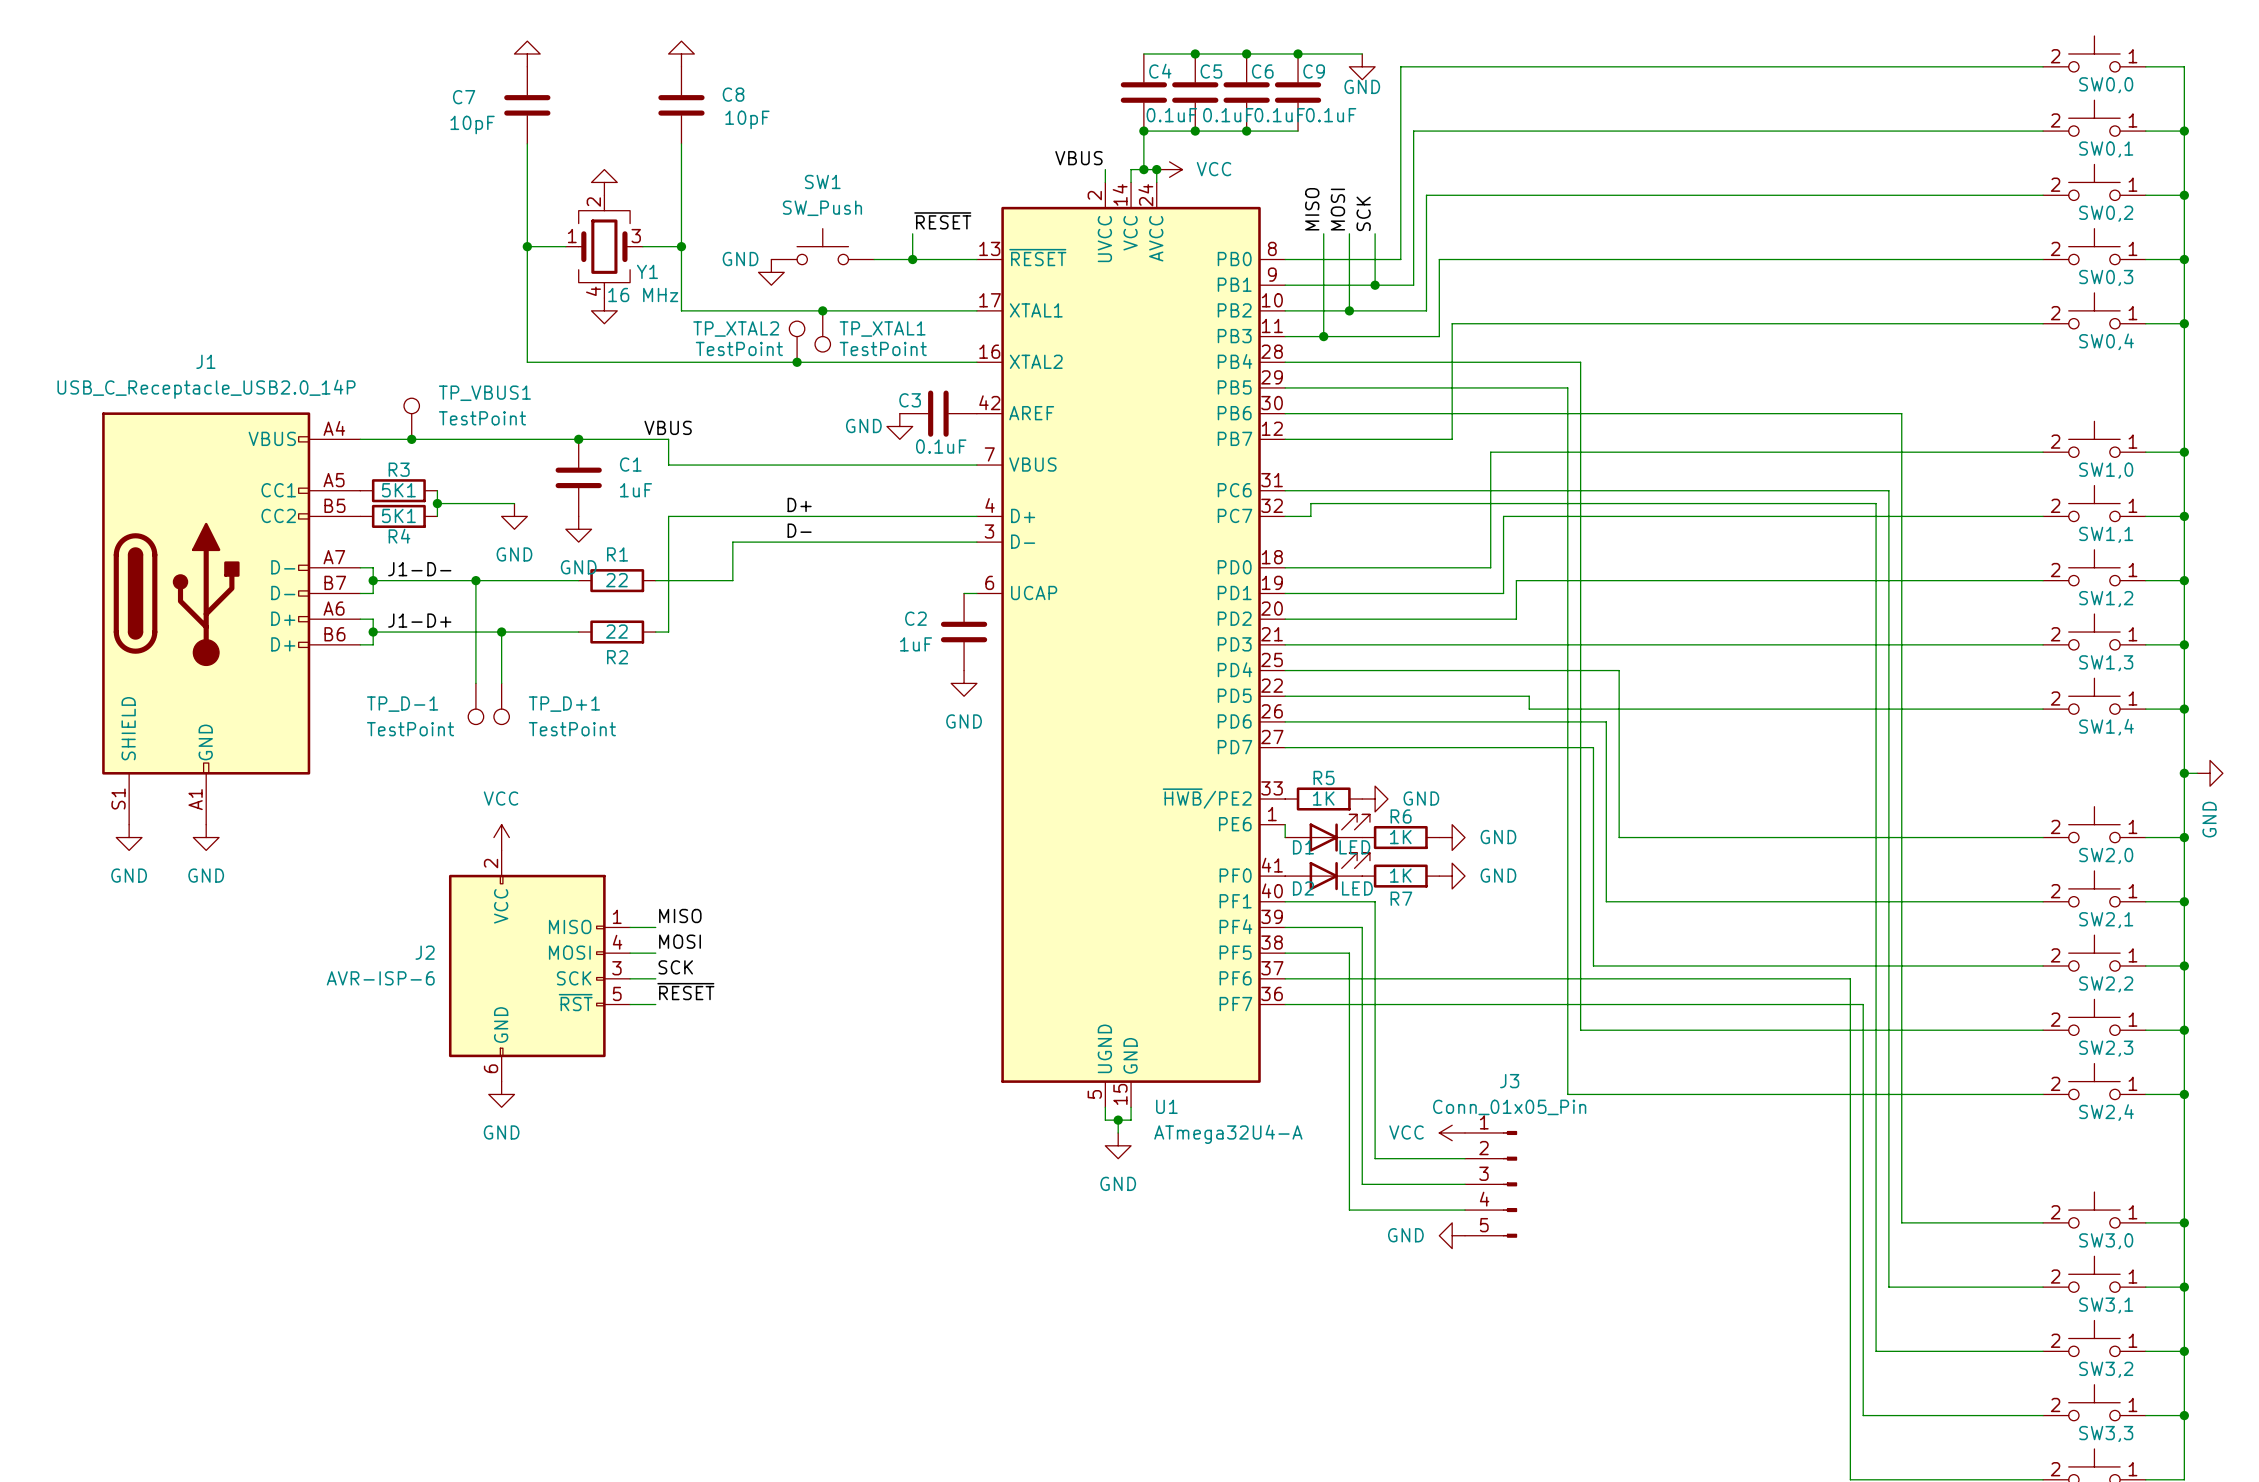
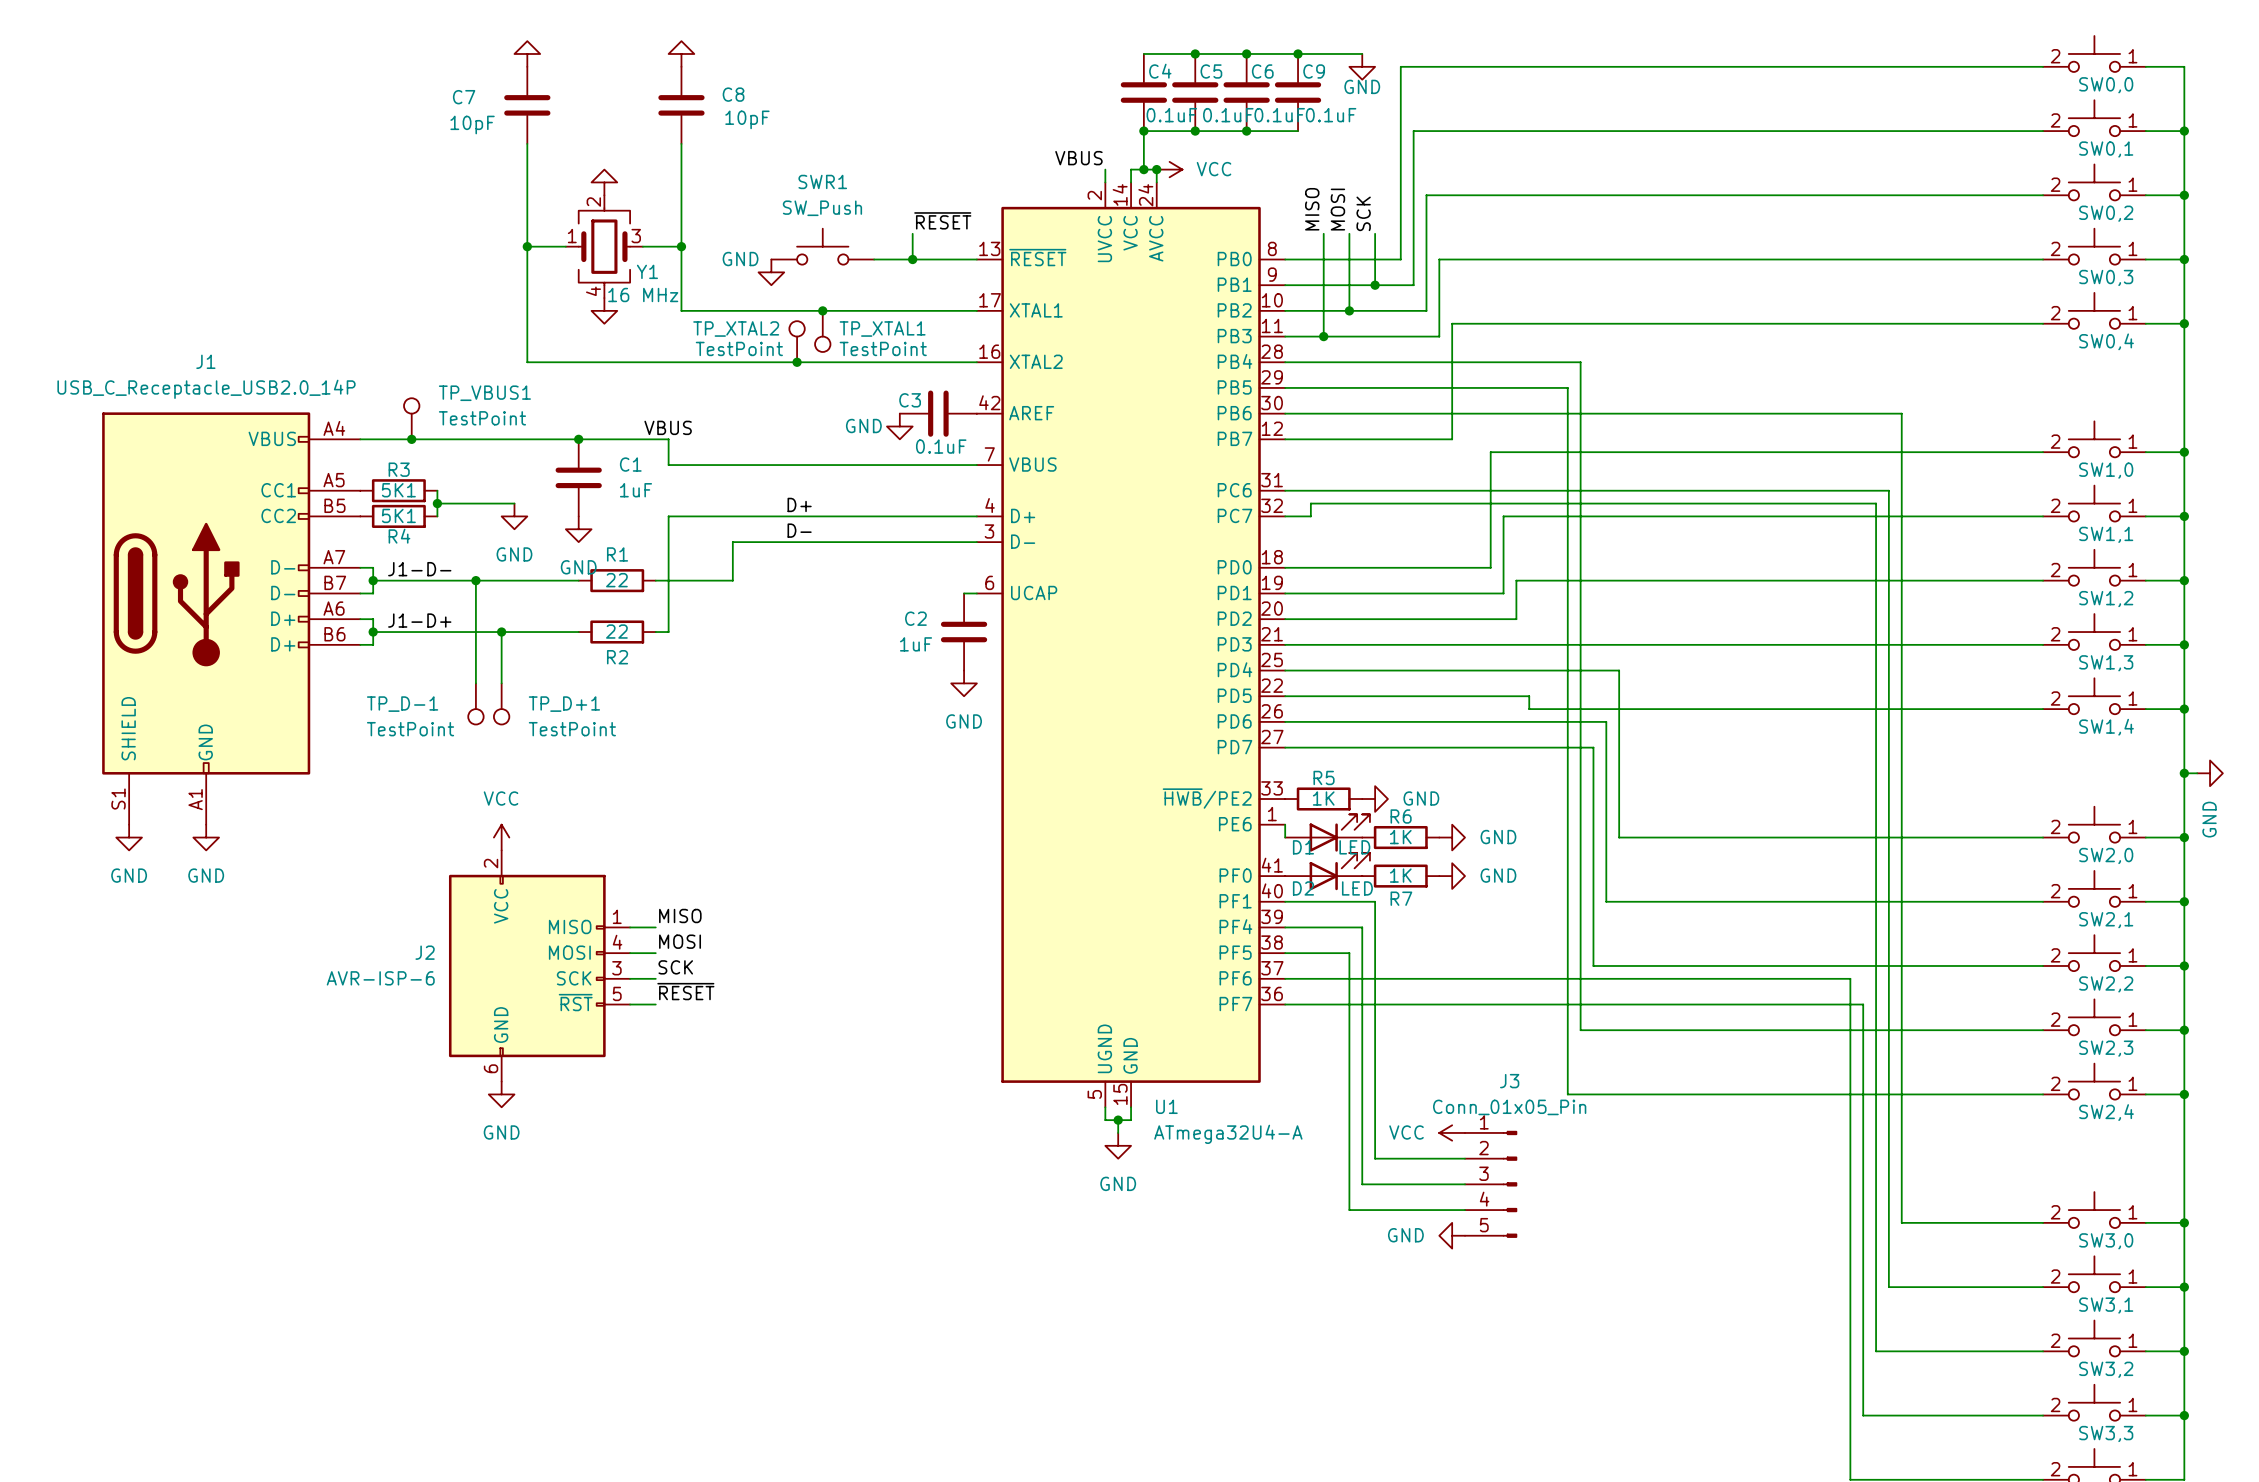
SW1 name: SW1 (822, 181) -> SWR1 (822, 181)

